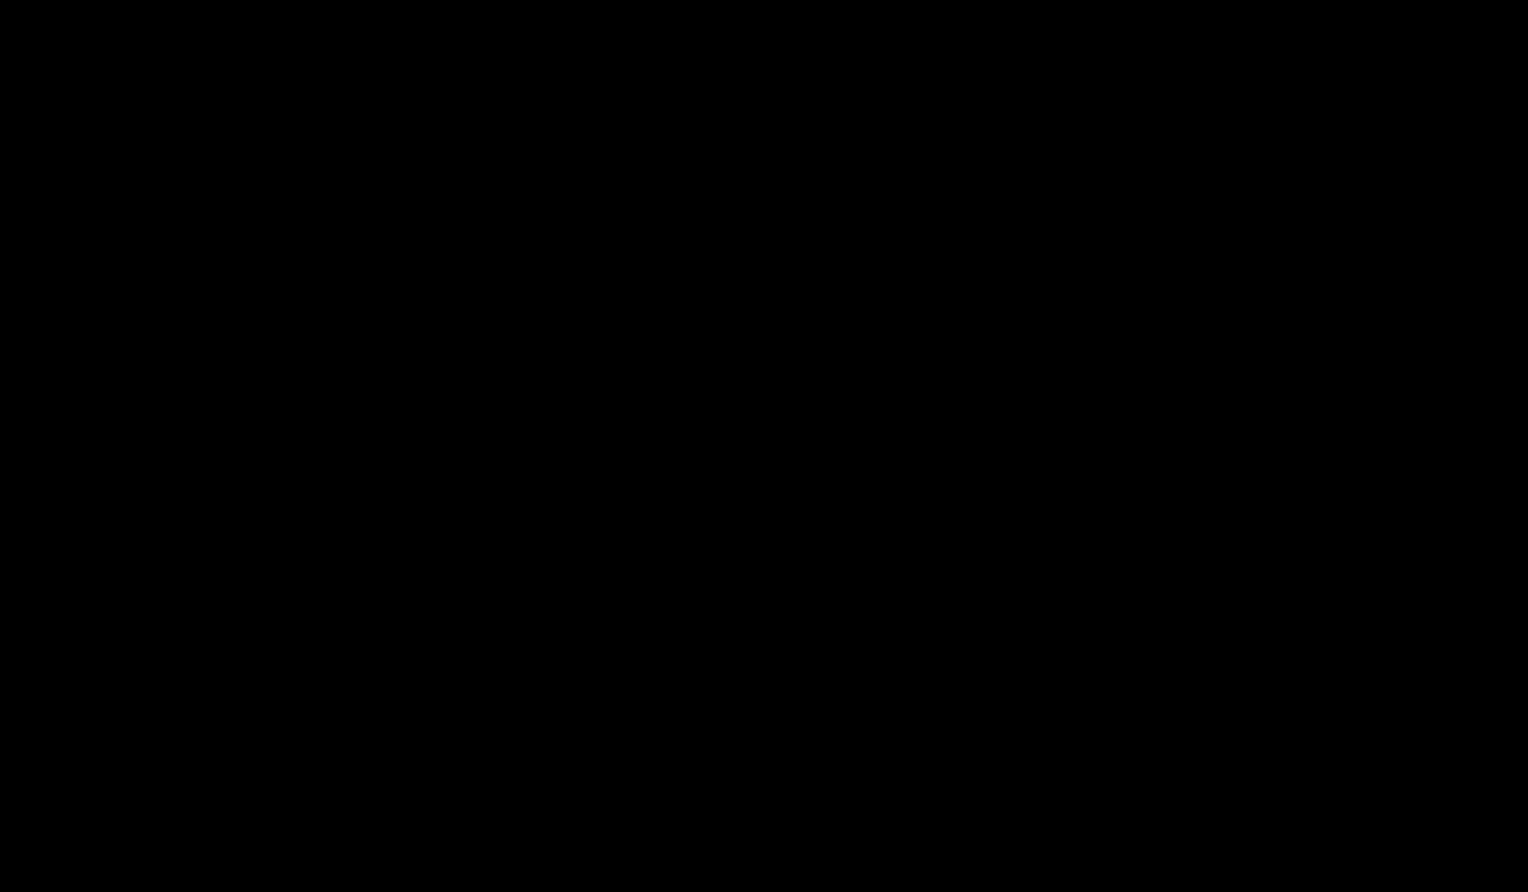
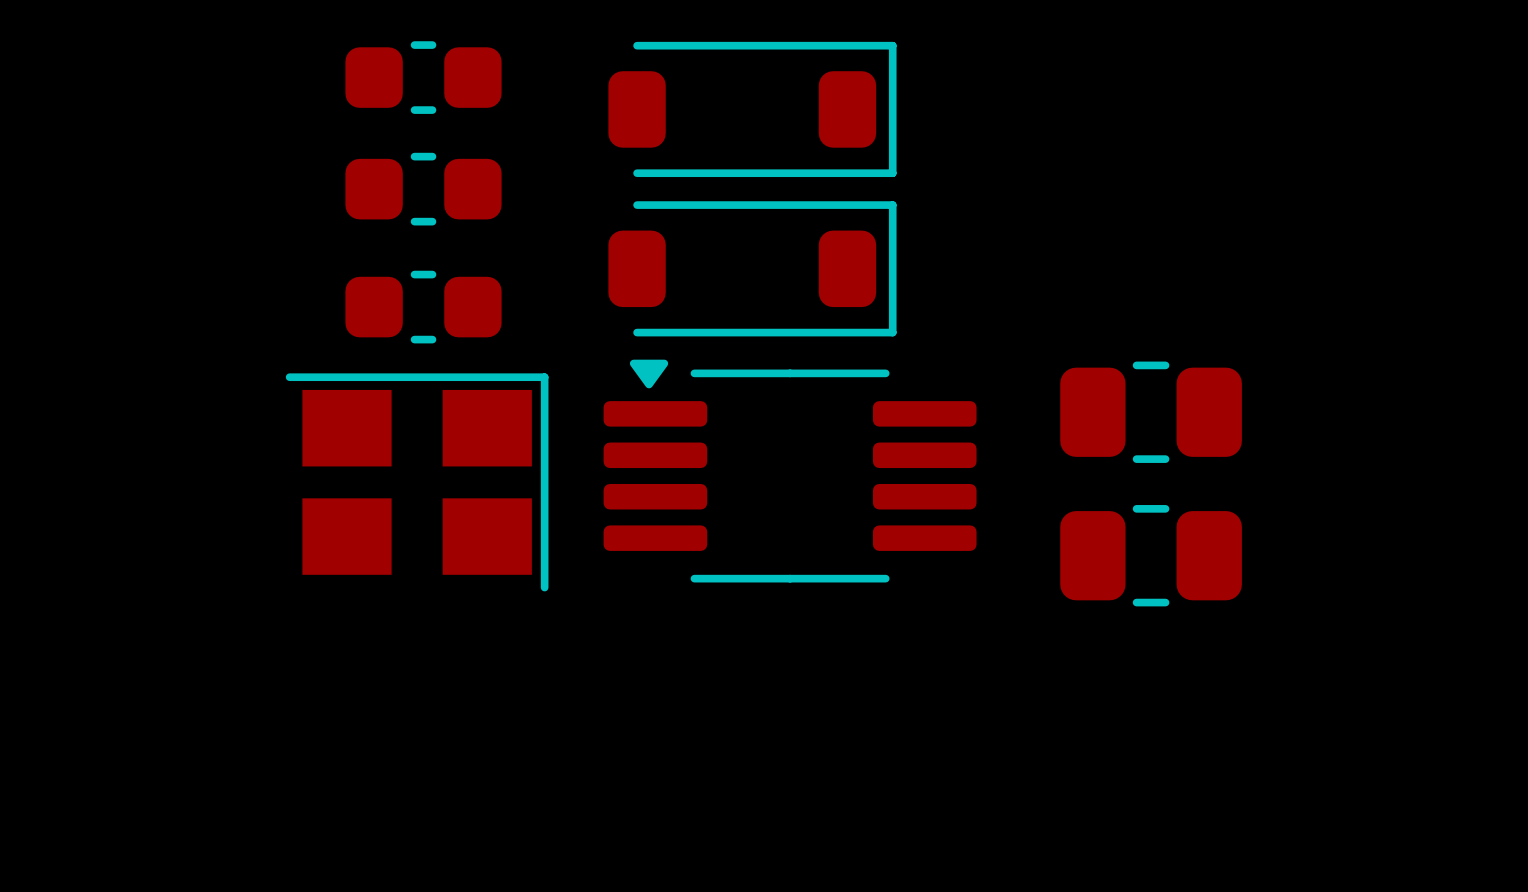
part: none -> (423, 77)
part: none -> (752, 109)
part: none -> (423, 189)
part: none -> (752, 268)
part: none -> (423, 307)
part: none -> (1151, 412)
part: none -> (790, 471)
part: none -> (417, 482)
part: none -> (1151, 555)

